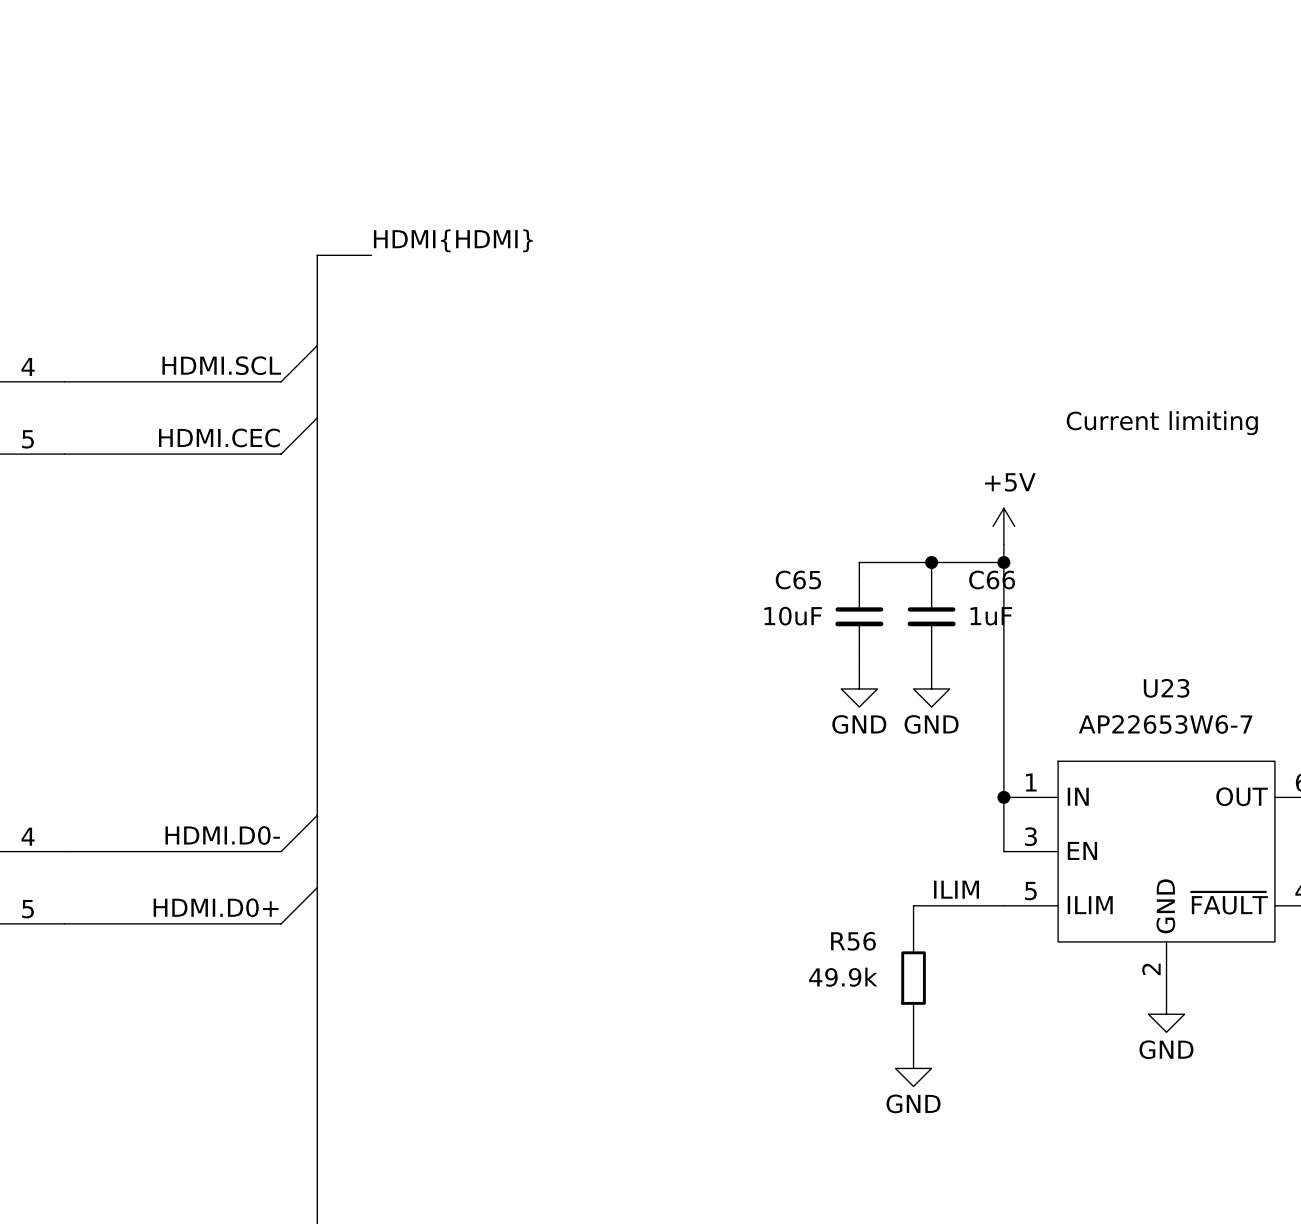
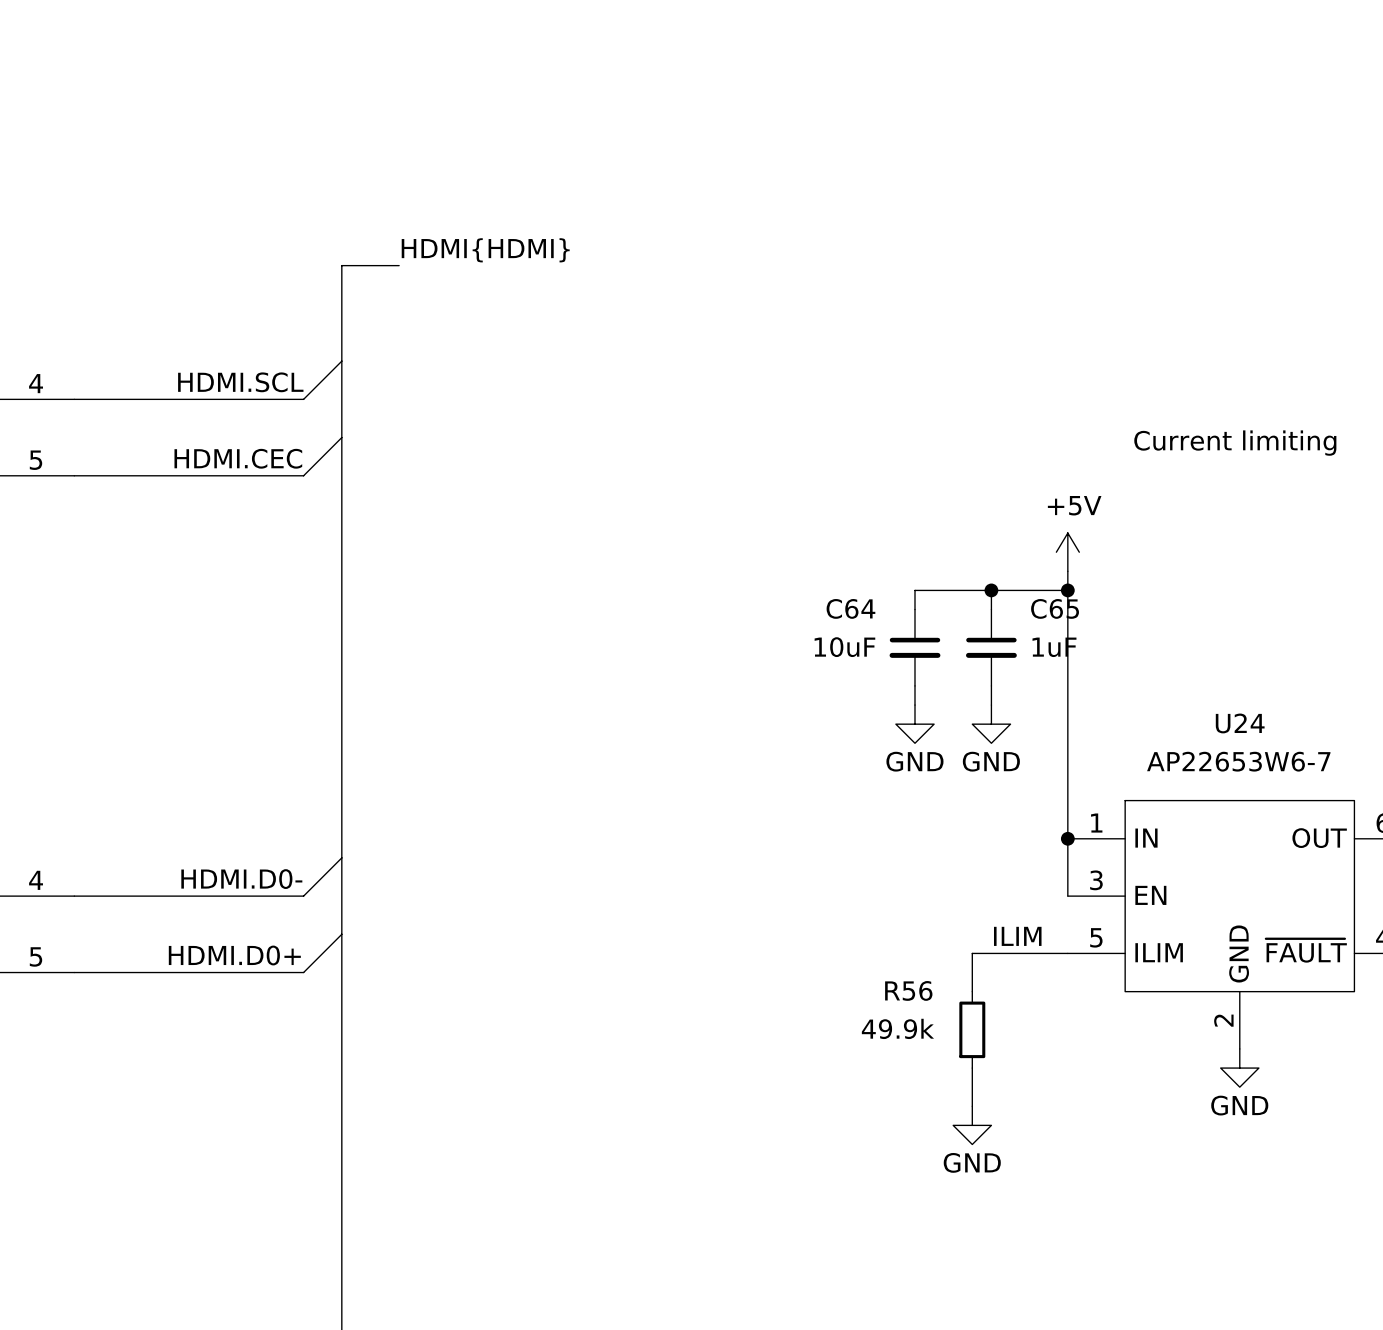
C65 name: C65 (798, 579) -> C64 (850, 608)
C66 name: C66 (992, 579) -> C65 (1055, 608)
U23 name: U23 (1166, 688) -> U24 (1240, 723)

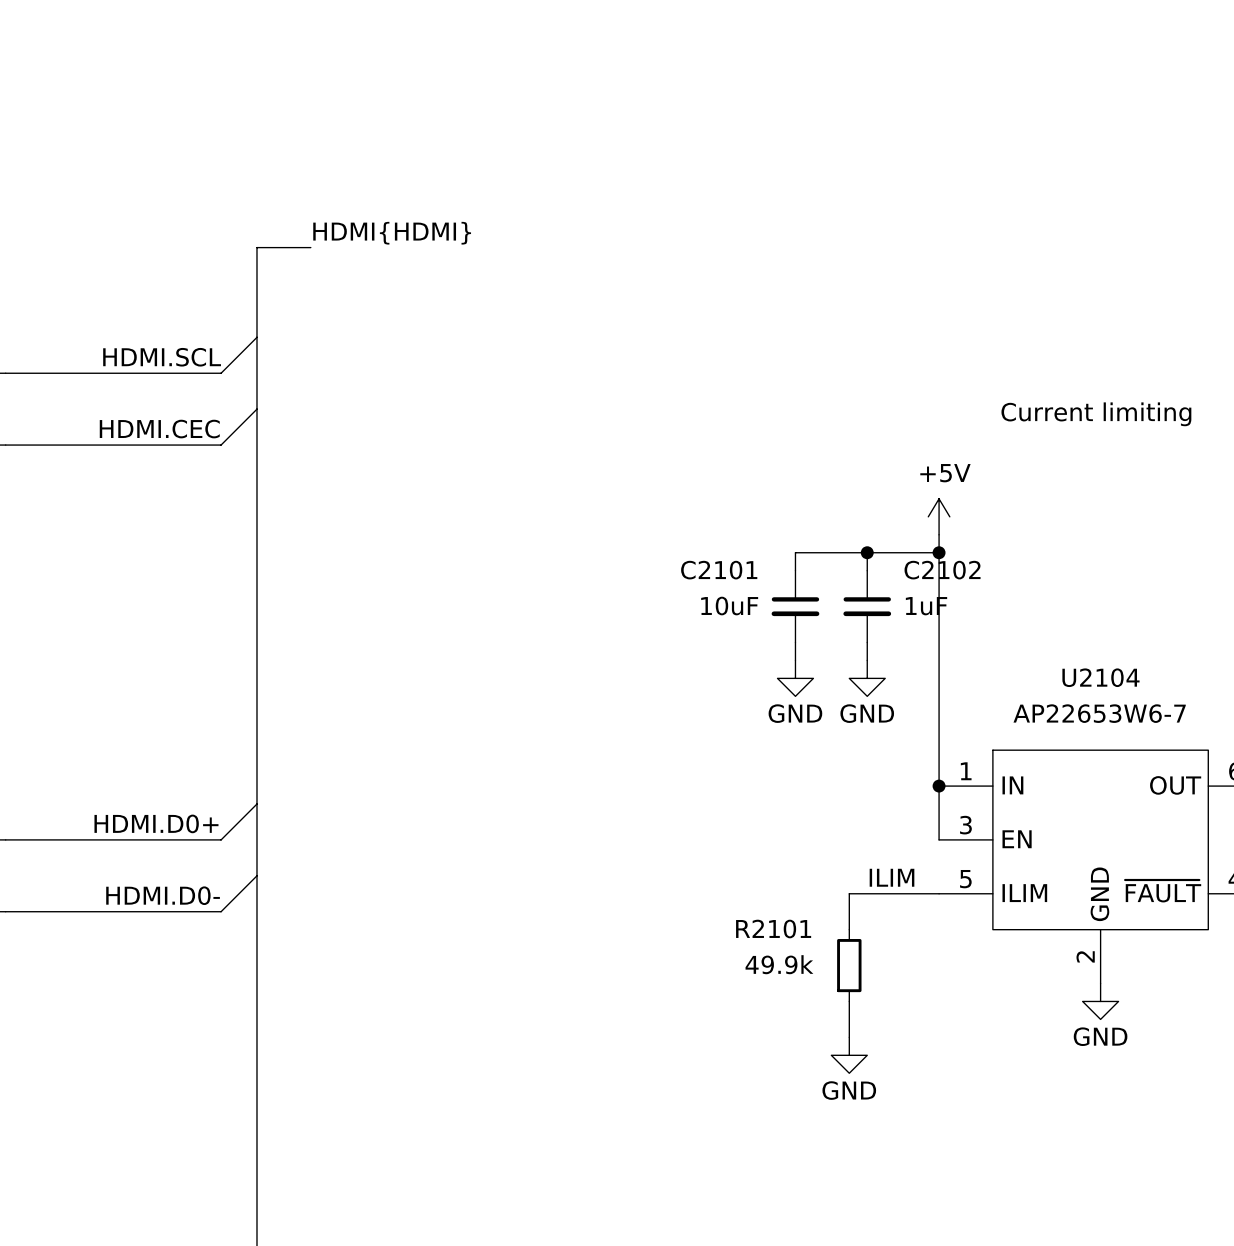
C64 name: C64 (850, 608) -> C2101 (719, 570)
C65 name: C65 (1055, 608) -> C2102 (942, 570)
U24 name: U24 (1240, 723) -> U2104 (1100, 677)
label: HDMI.D0- (241, 879) -> HDMI.D0+ (156, 823)
label: HDMI.D0+ (234, 955) -> HDMI.D0- (163, 895)
R56 name: R56 (908, 990) -> R2101 (773, 929)

